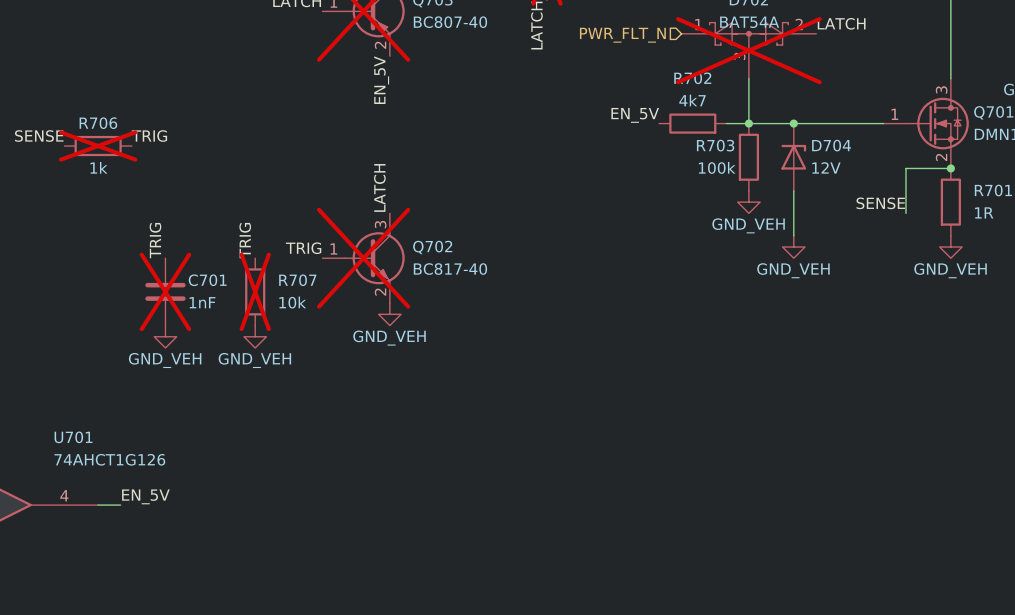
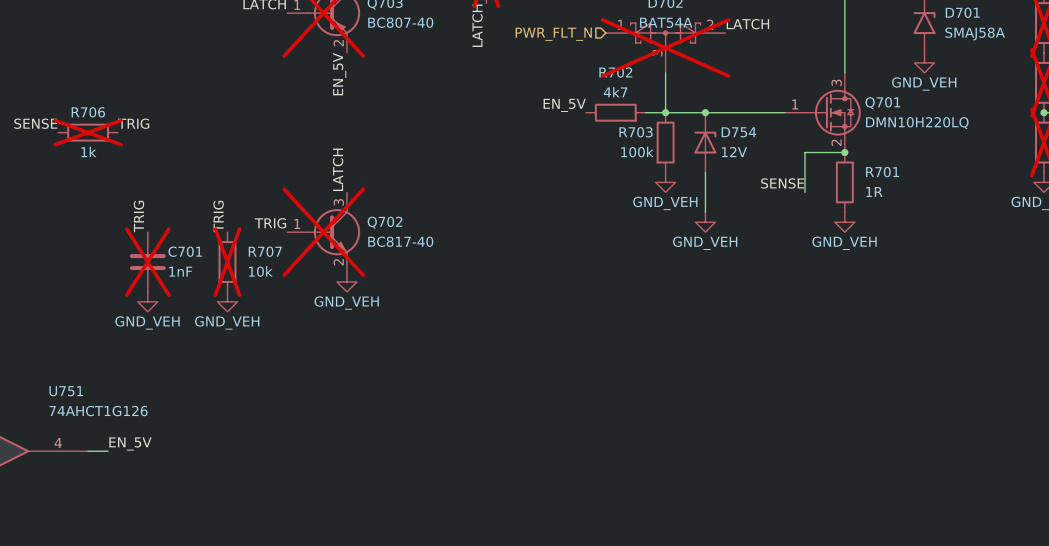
D704 name: D704 (831, 145) -> D754 (738, 132)
U701 name: U701 (73, 437) -> U751 (66, 391)

